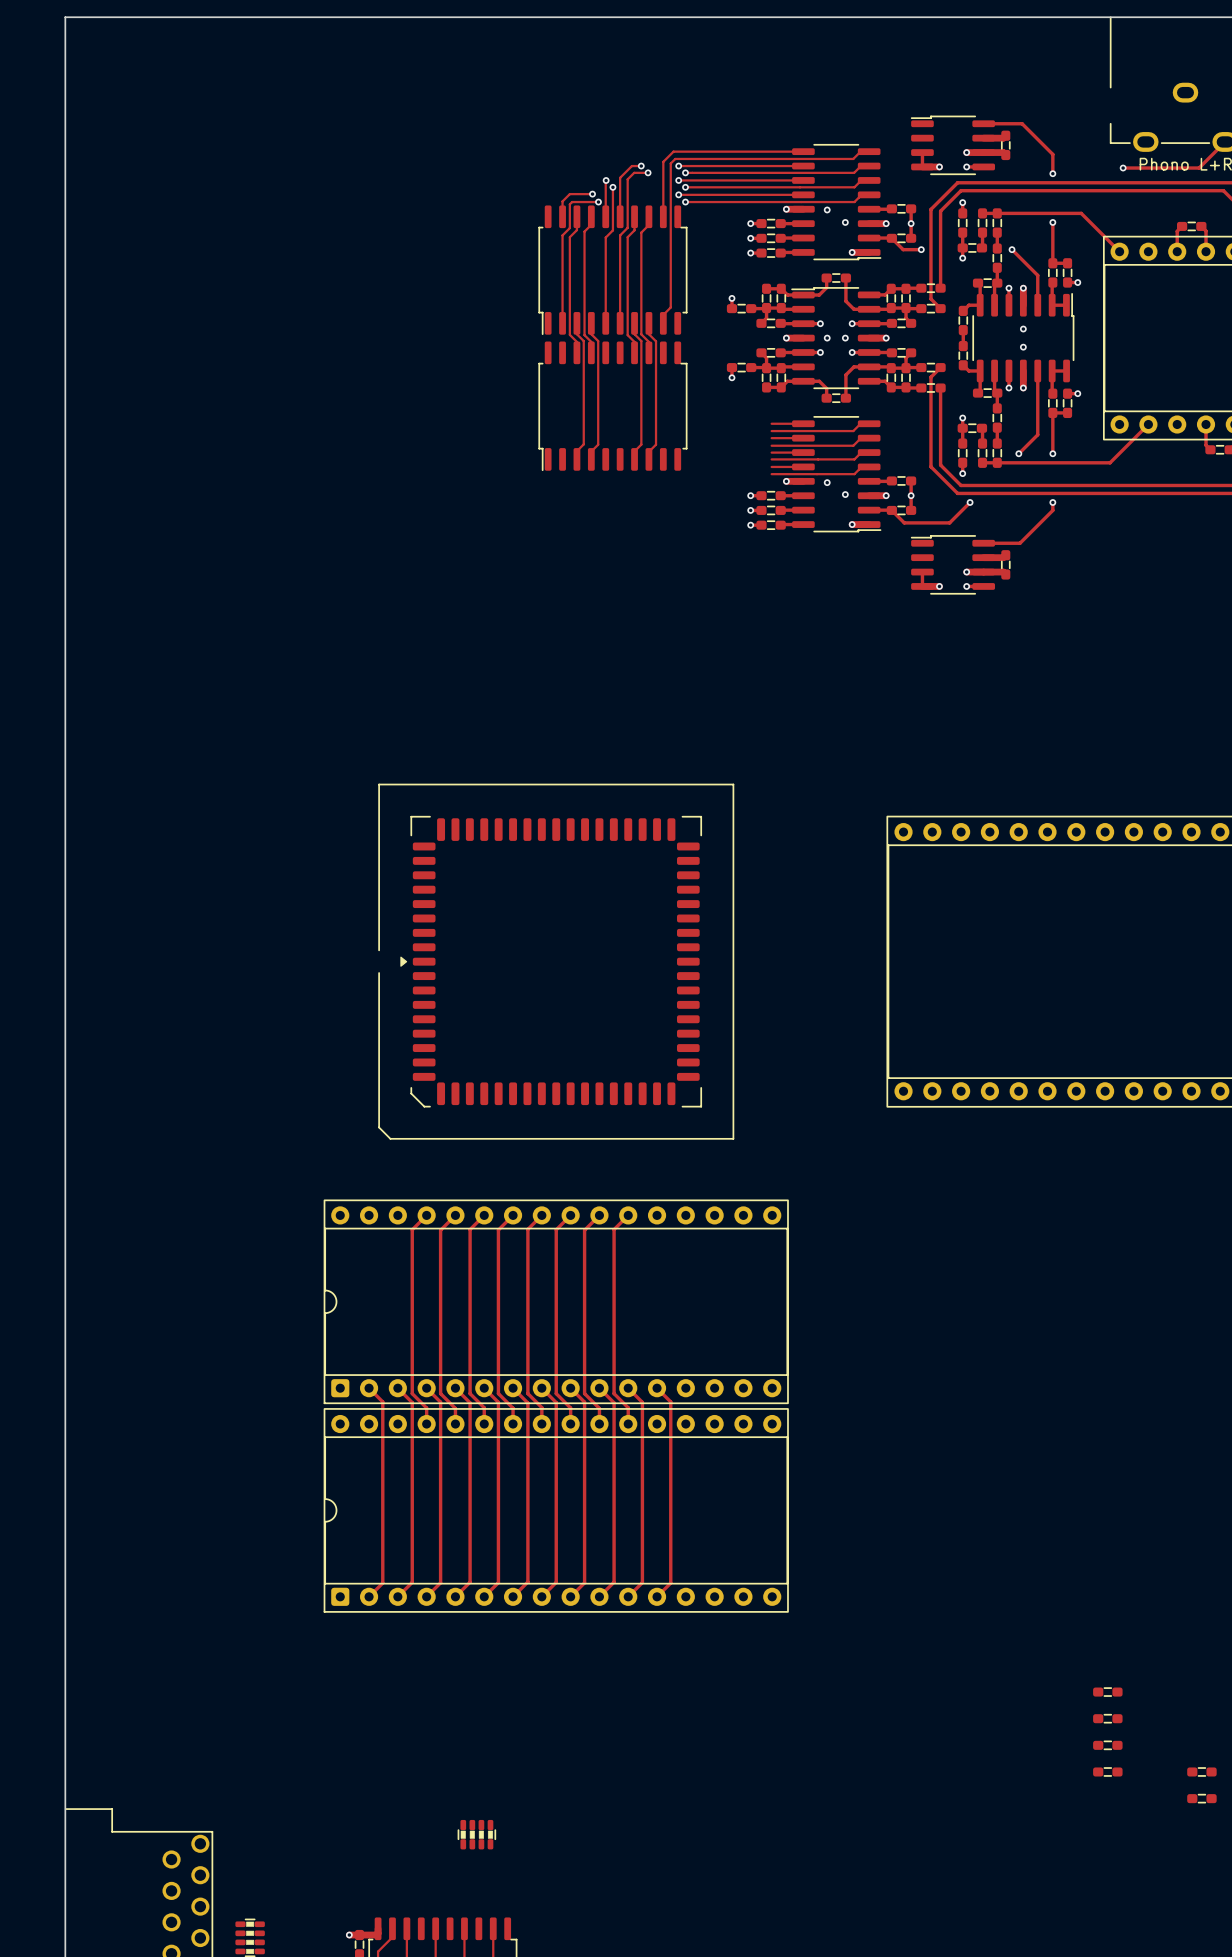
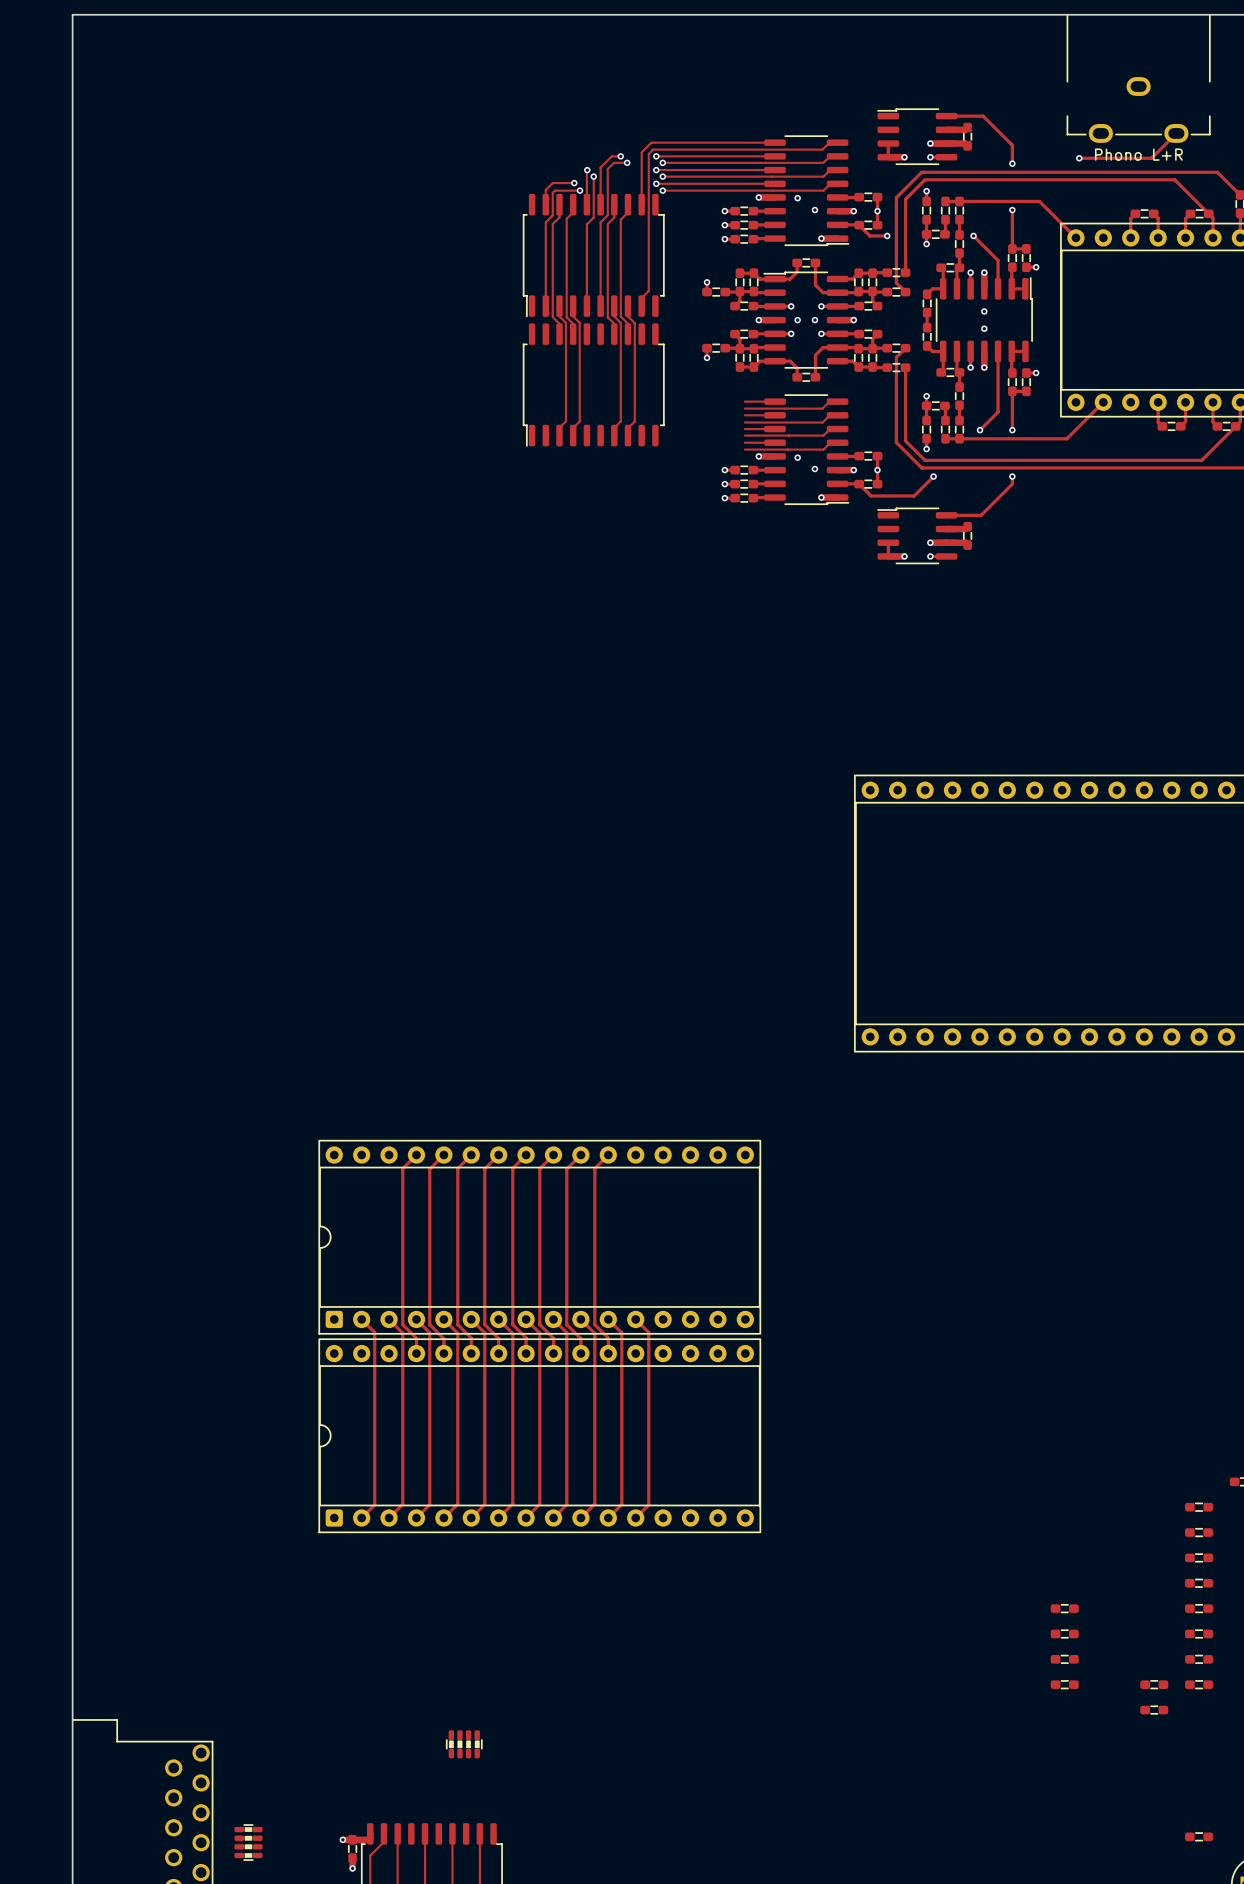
part: (556, 961) -> none

